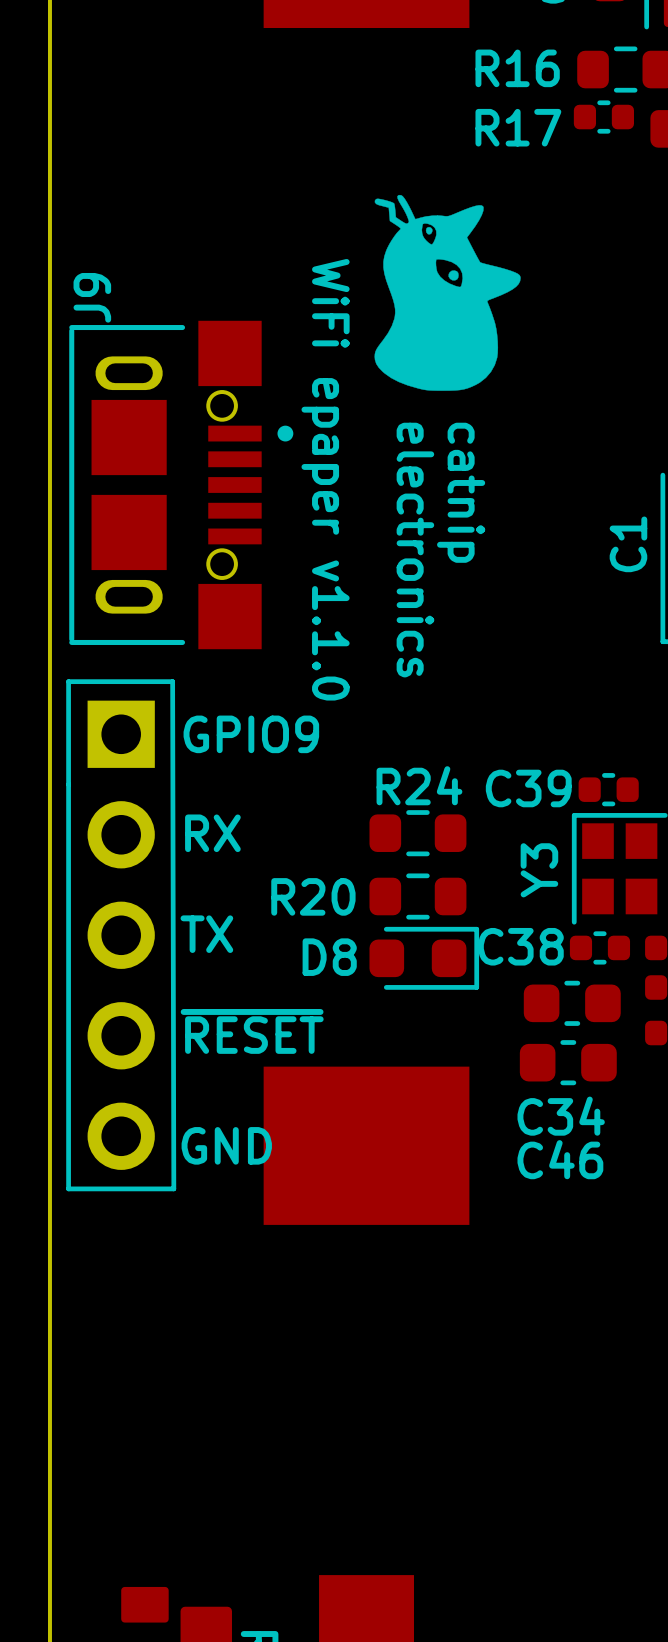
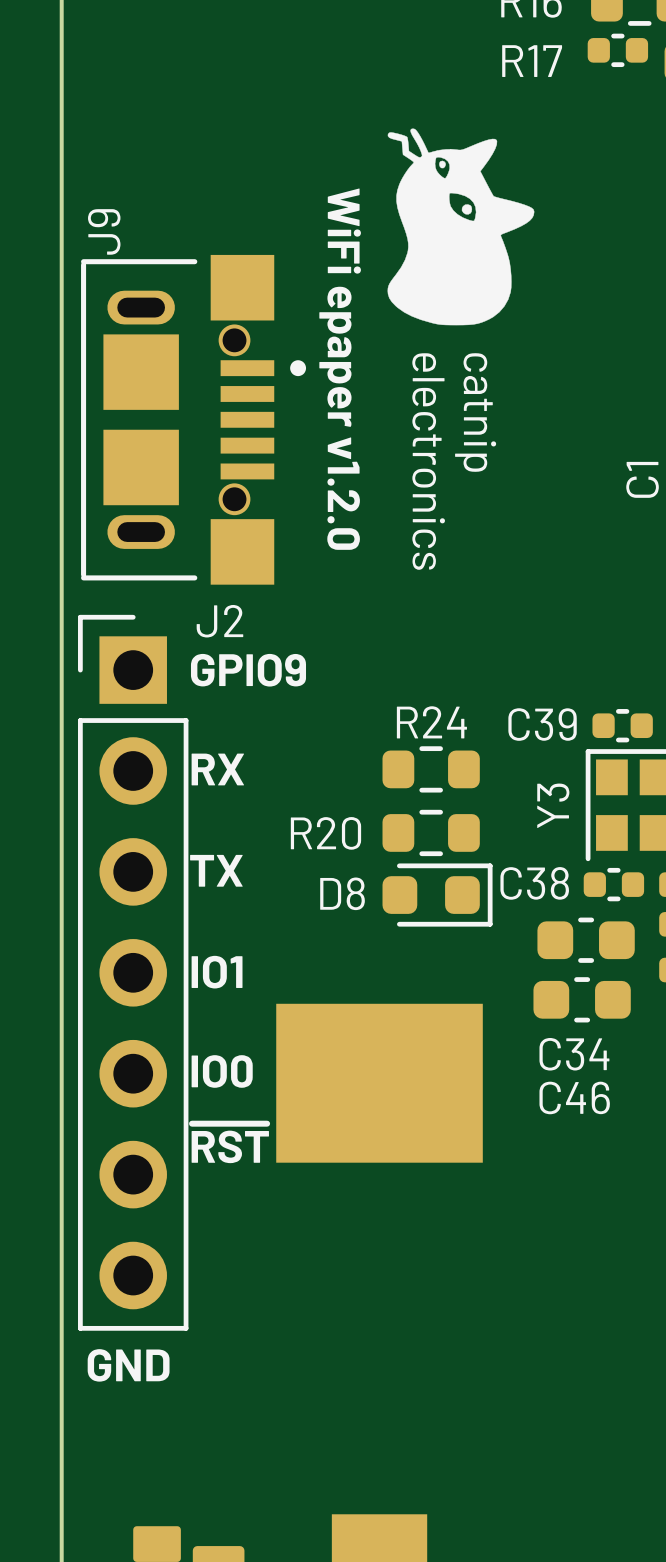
text: WiFi epaper v1.1.0 (325, 479) -> WiFi epaper v1.2.0 (340, 369)
part: (121, 935) -> none
text: ~{RESET} (252, 1031) -> IO1 (217, 972)
J2: none -> (133, 972)
text: GND (226, 1145) -> IO0 (222, 1071)
text: none -> ~{RST} (230, 1143)
text: none -> GND (128, 1365)

